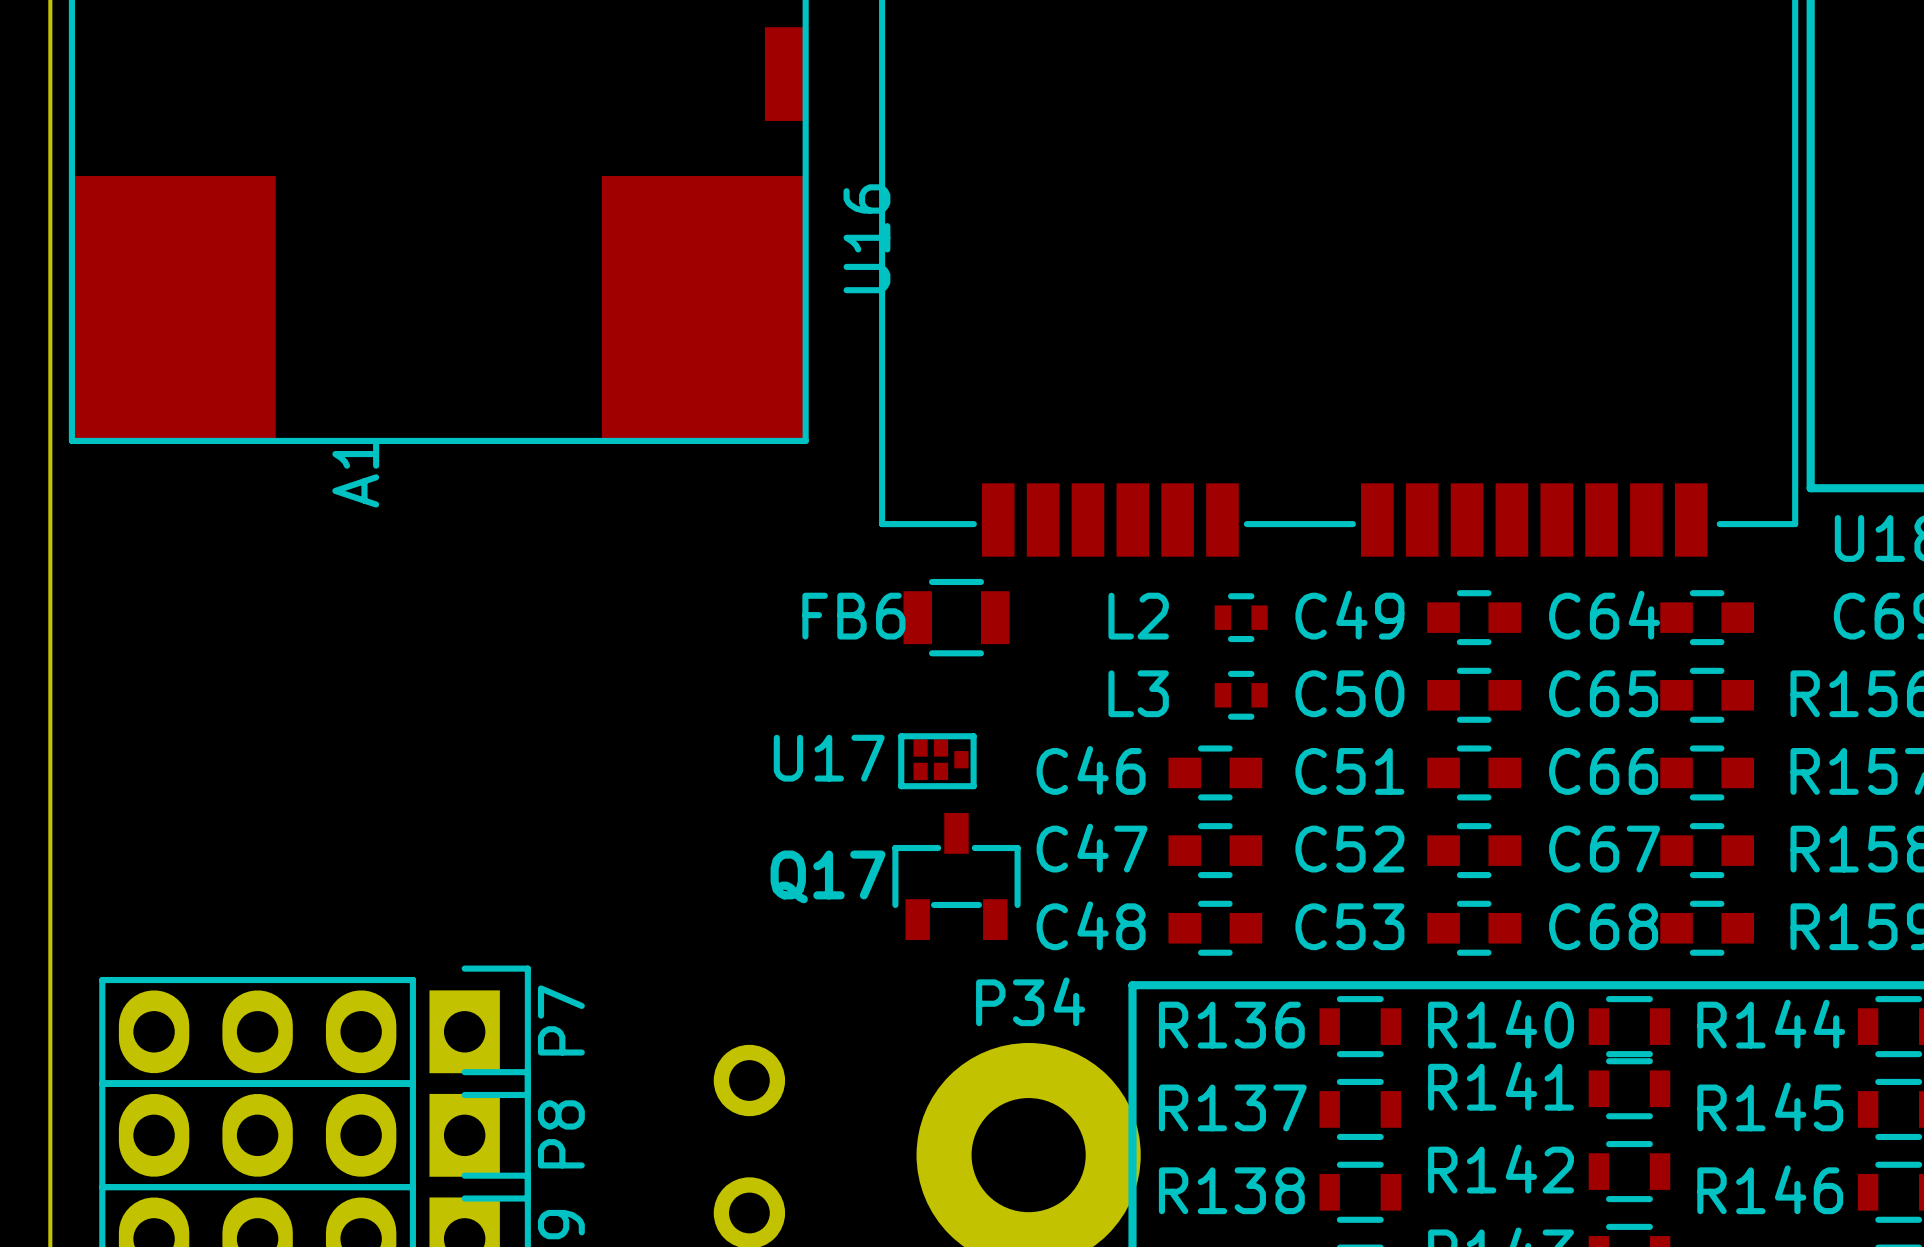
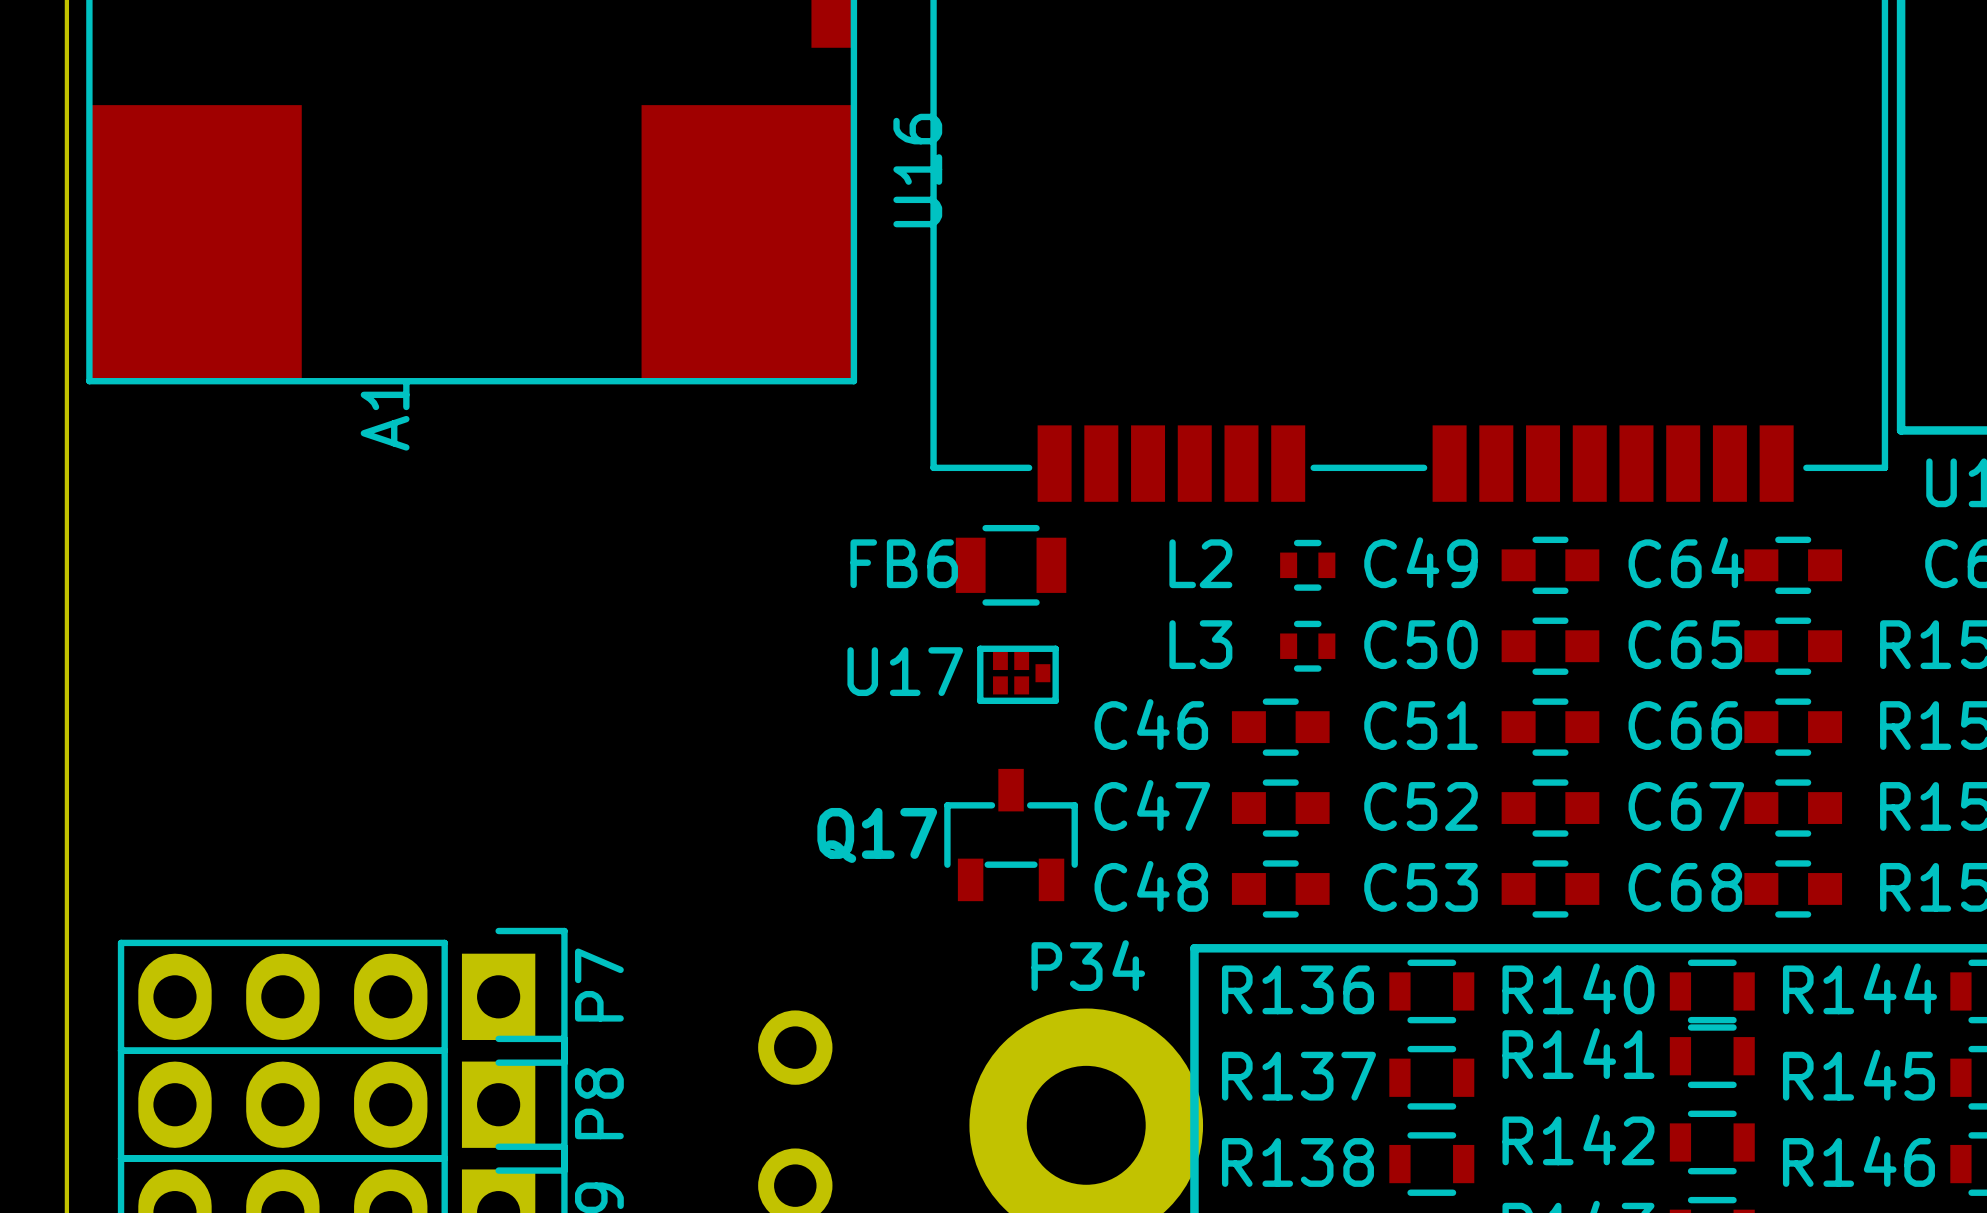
U17 position: (937, 761) -> (1017, 674)

